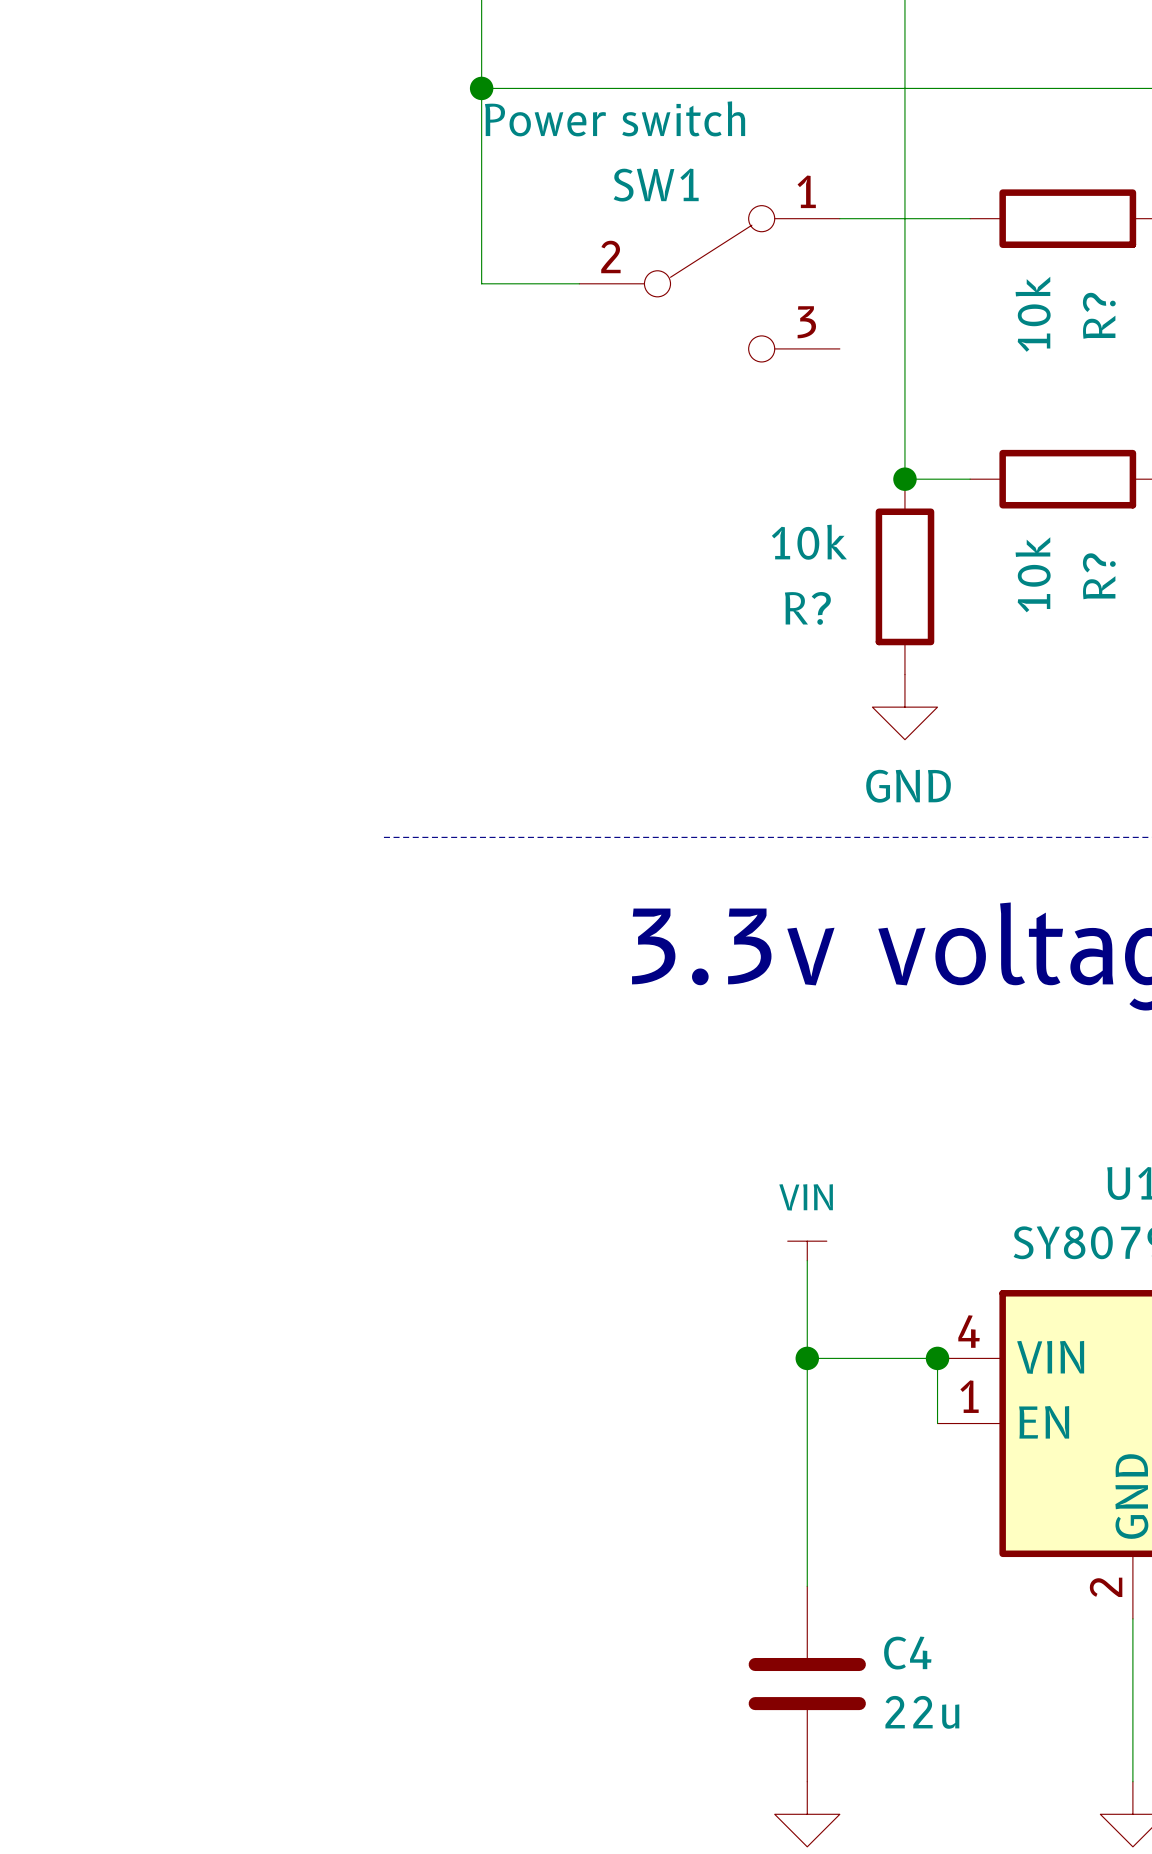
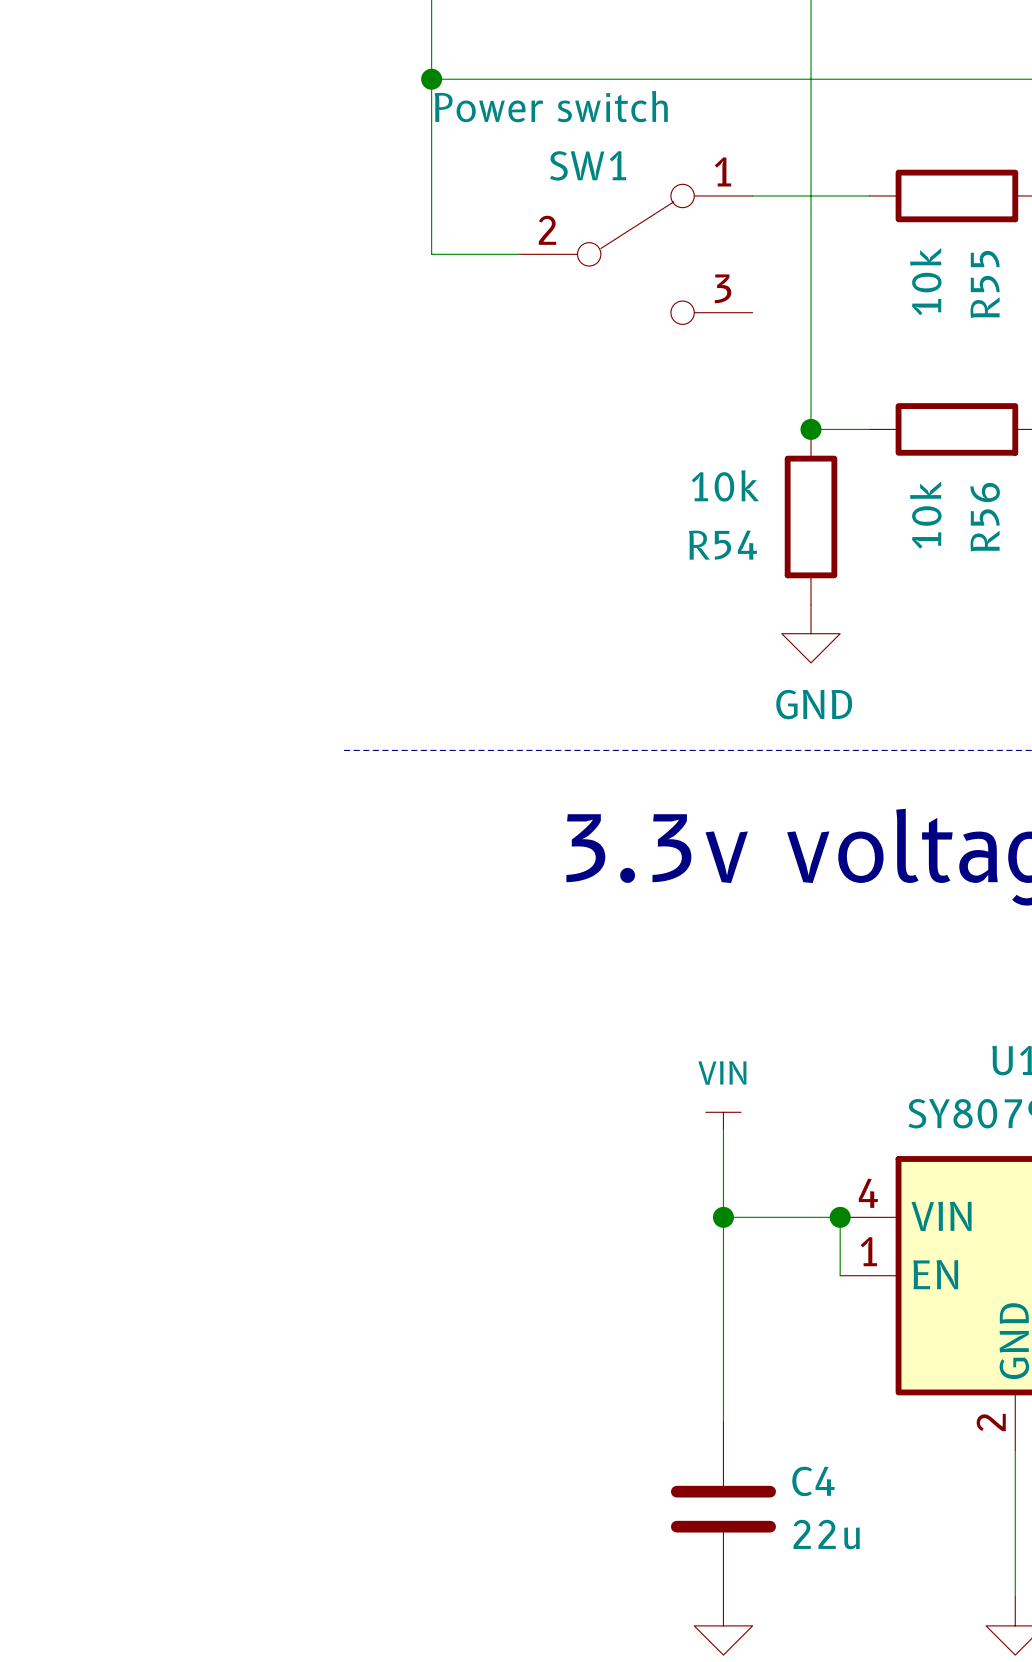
R? name: R? (1099, 315) -> R55 (985, 284)
R? name: R? (1099, 576) -> R56 (985, 517)
R? name: R? (807, 608) -> R54 (723, 545)

